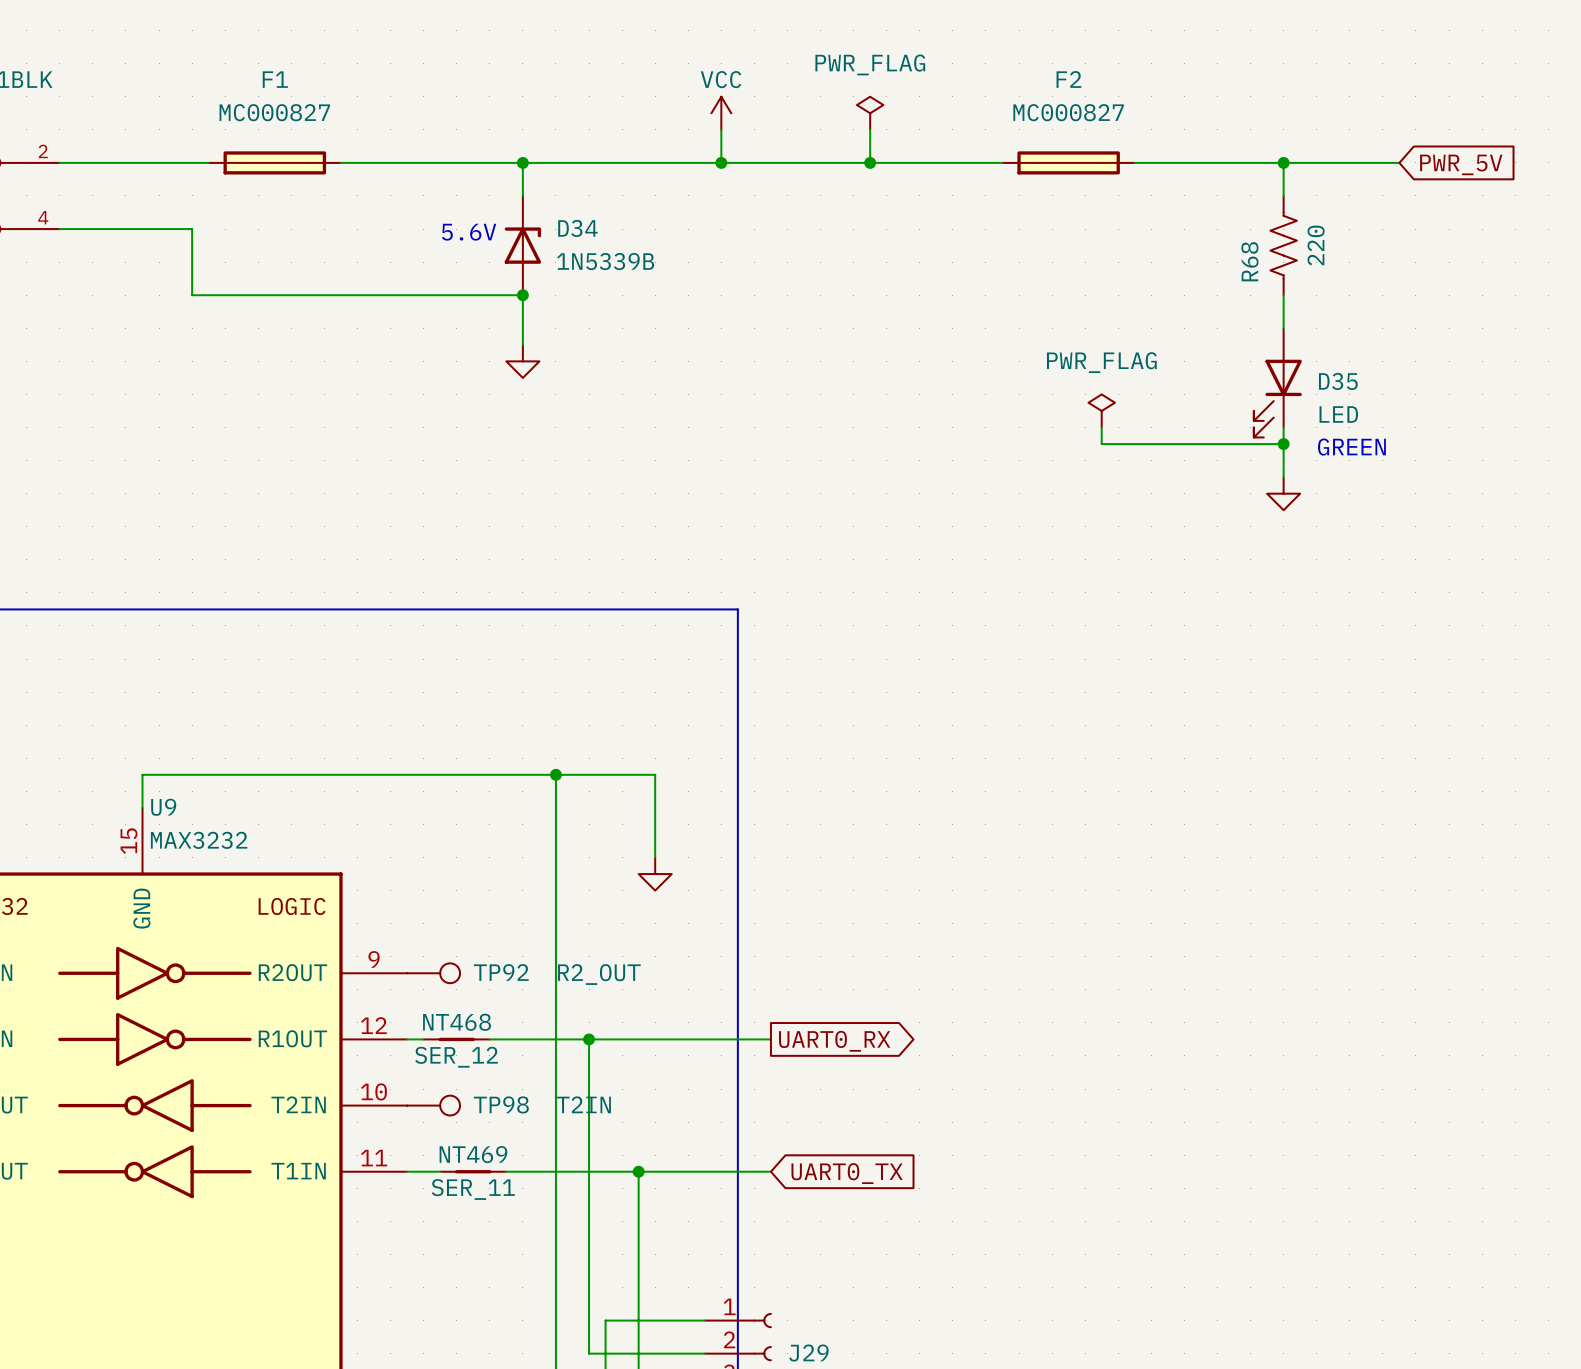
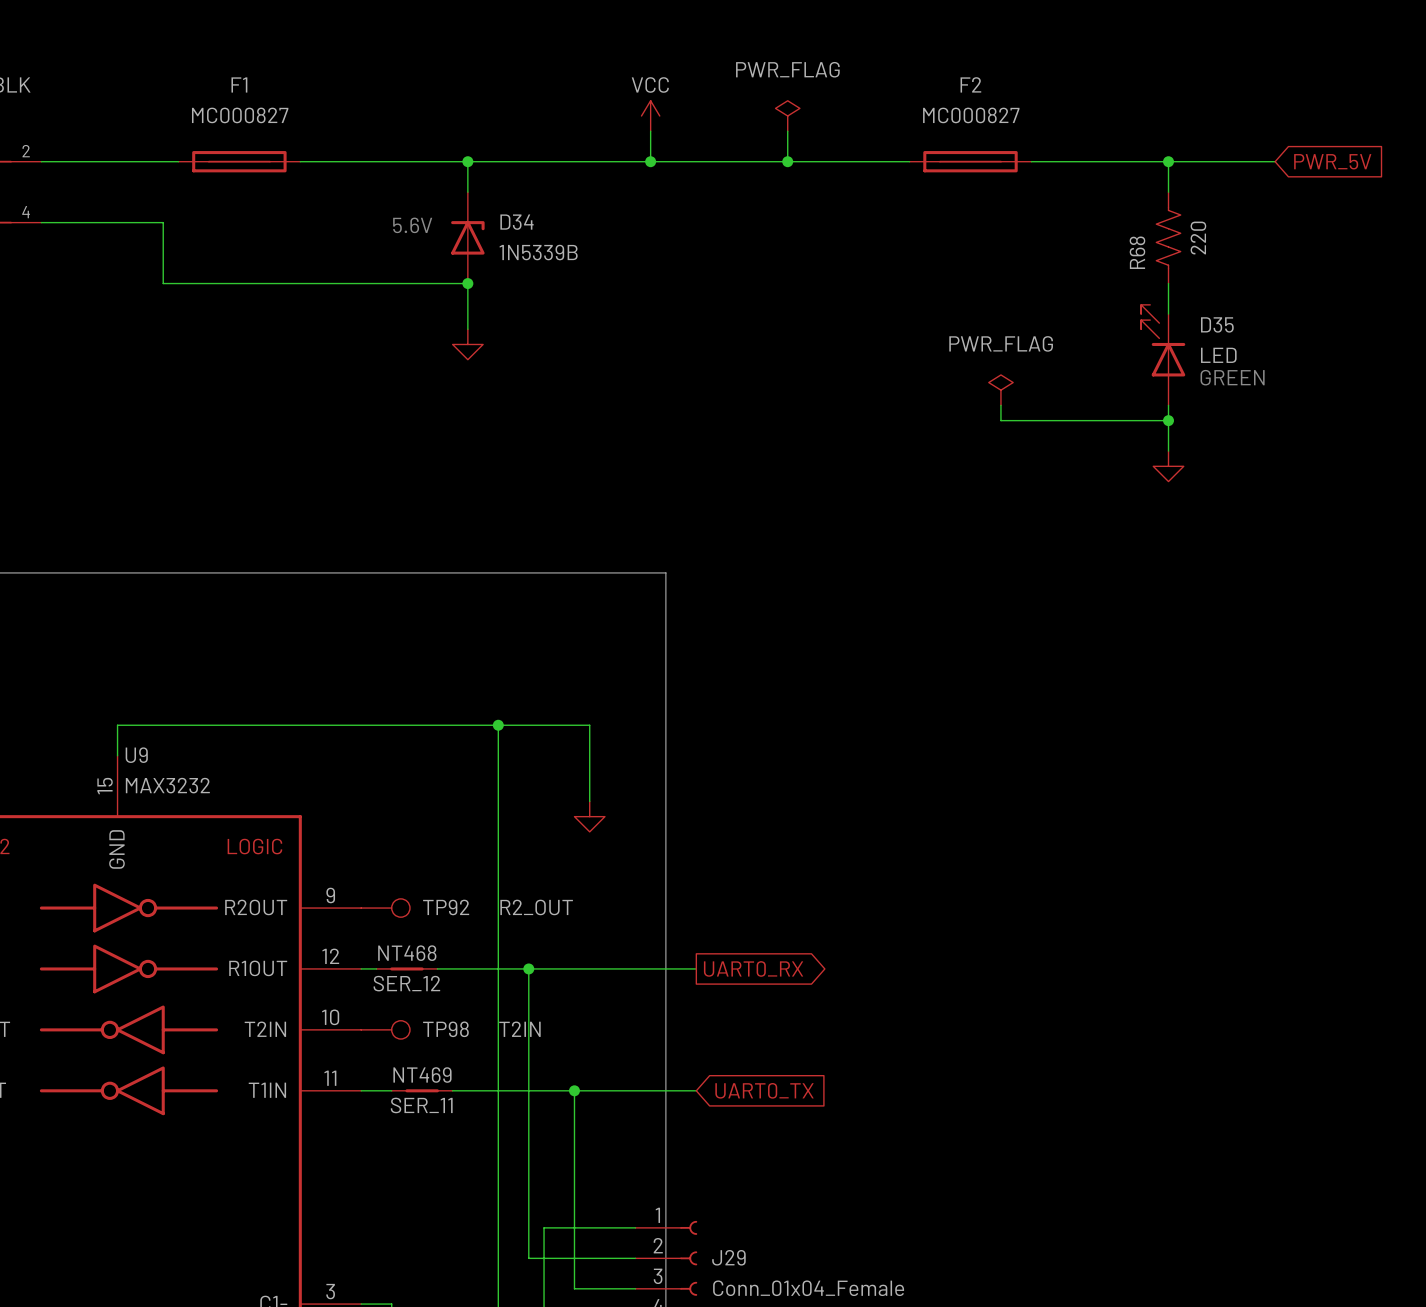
D35 name position: D35 (1338, 381) -> D35 (1217, 324)
D35 flip: as is (1277, 398) -> up-down (1163, 340)
D35 value position: LED (1338, 414) -> LED (1218, 355)
text position: GREEN (1351, 447) -> GREEN (1232, 377)

